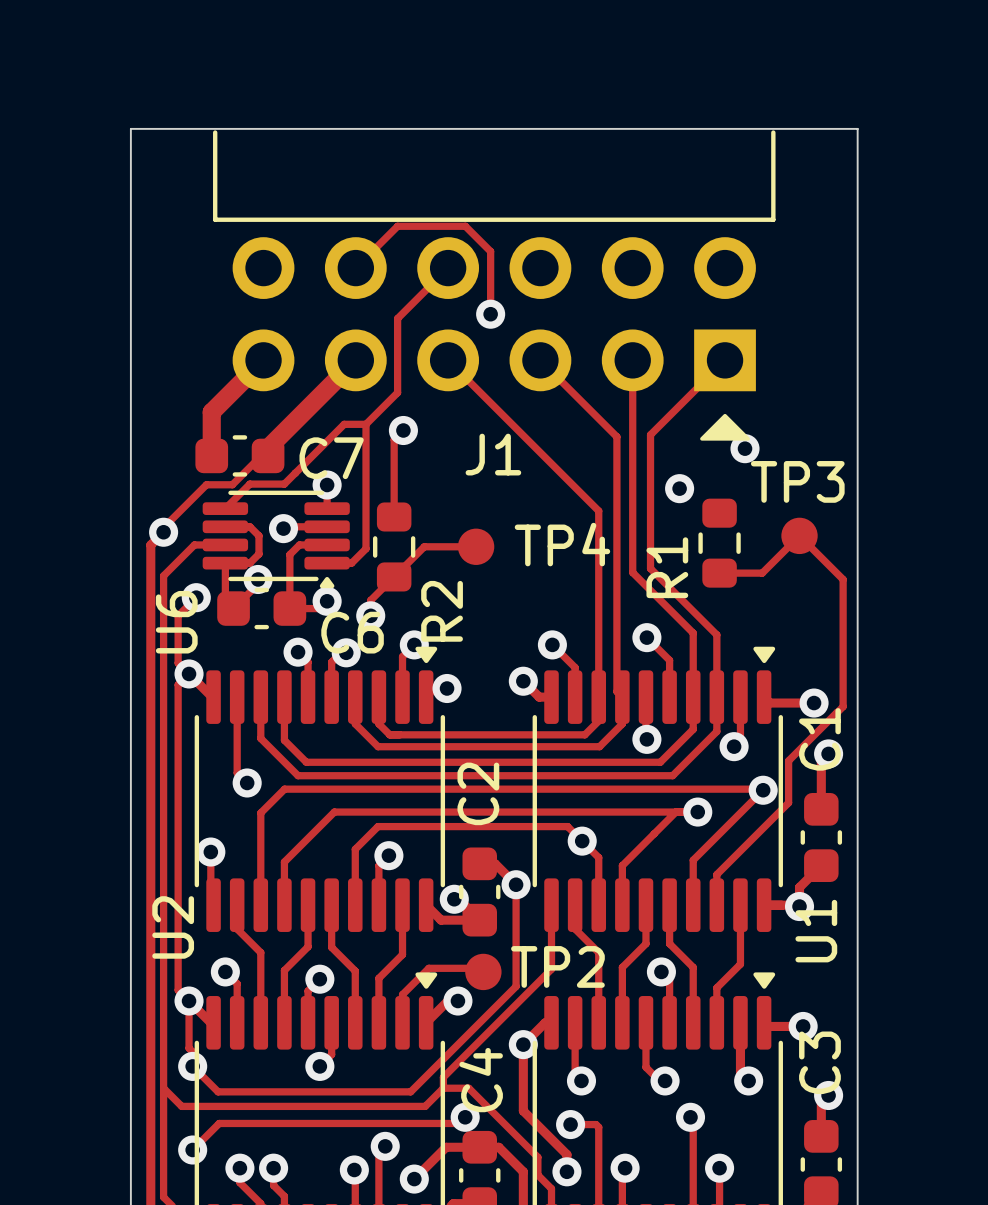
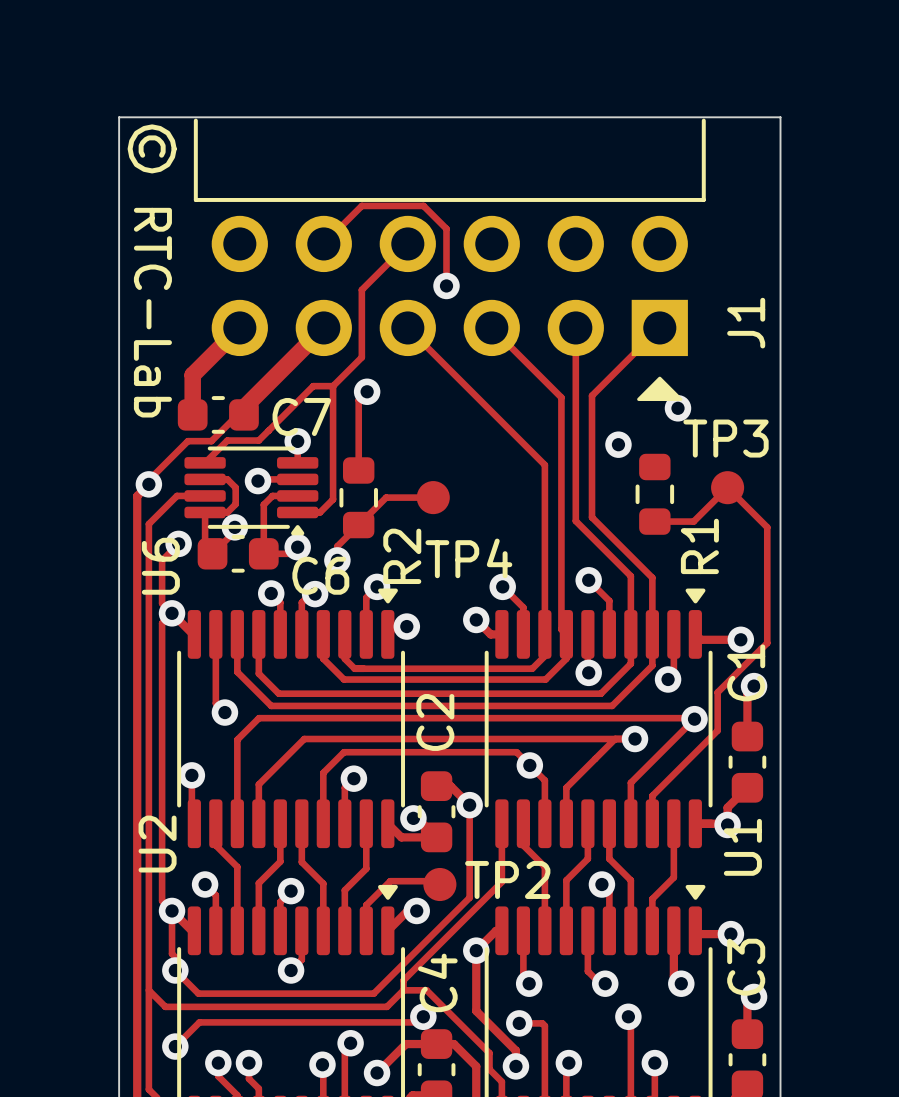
text: none -> © RTC-Lab (152, 270)
J1 name rotation: 0° (493, 454) -> 90° counterclockwise (746, 323)
J1 name position: J1 (493, 454) -> J1 (746, 323)
TP4 name position: TP4 (562, 544) -> TP4 (468, 558)
R1 name position: R1 (667, 567) -> R1 (699, 546)

